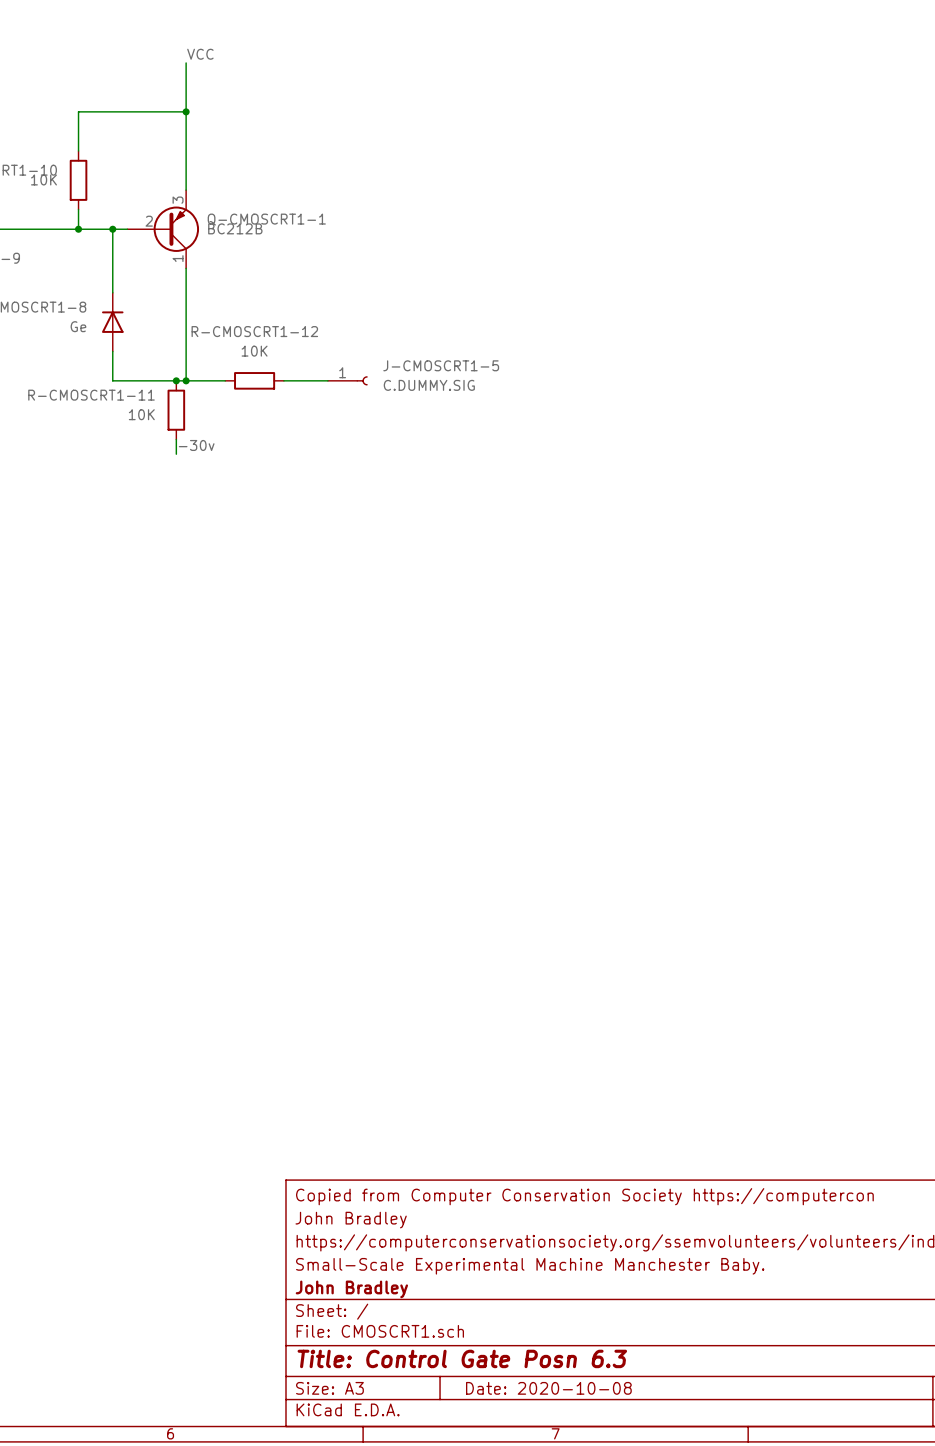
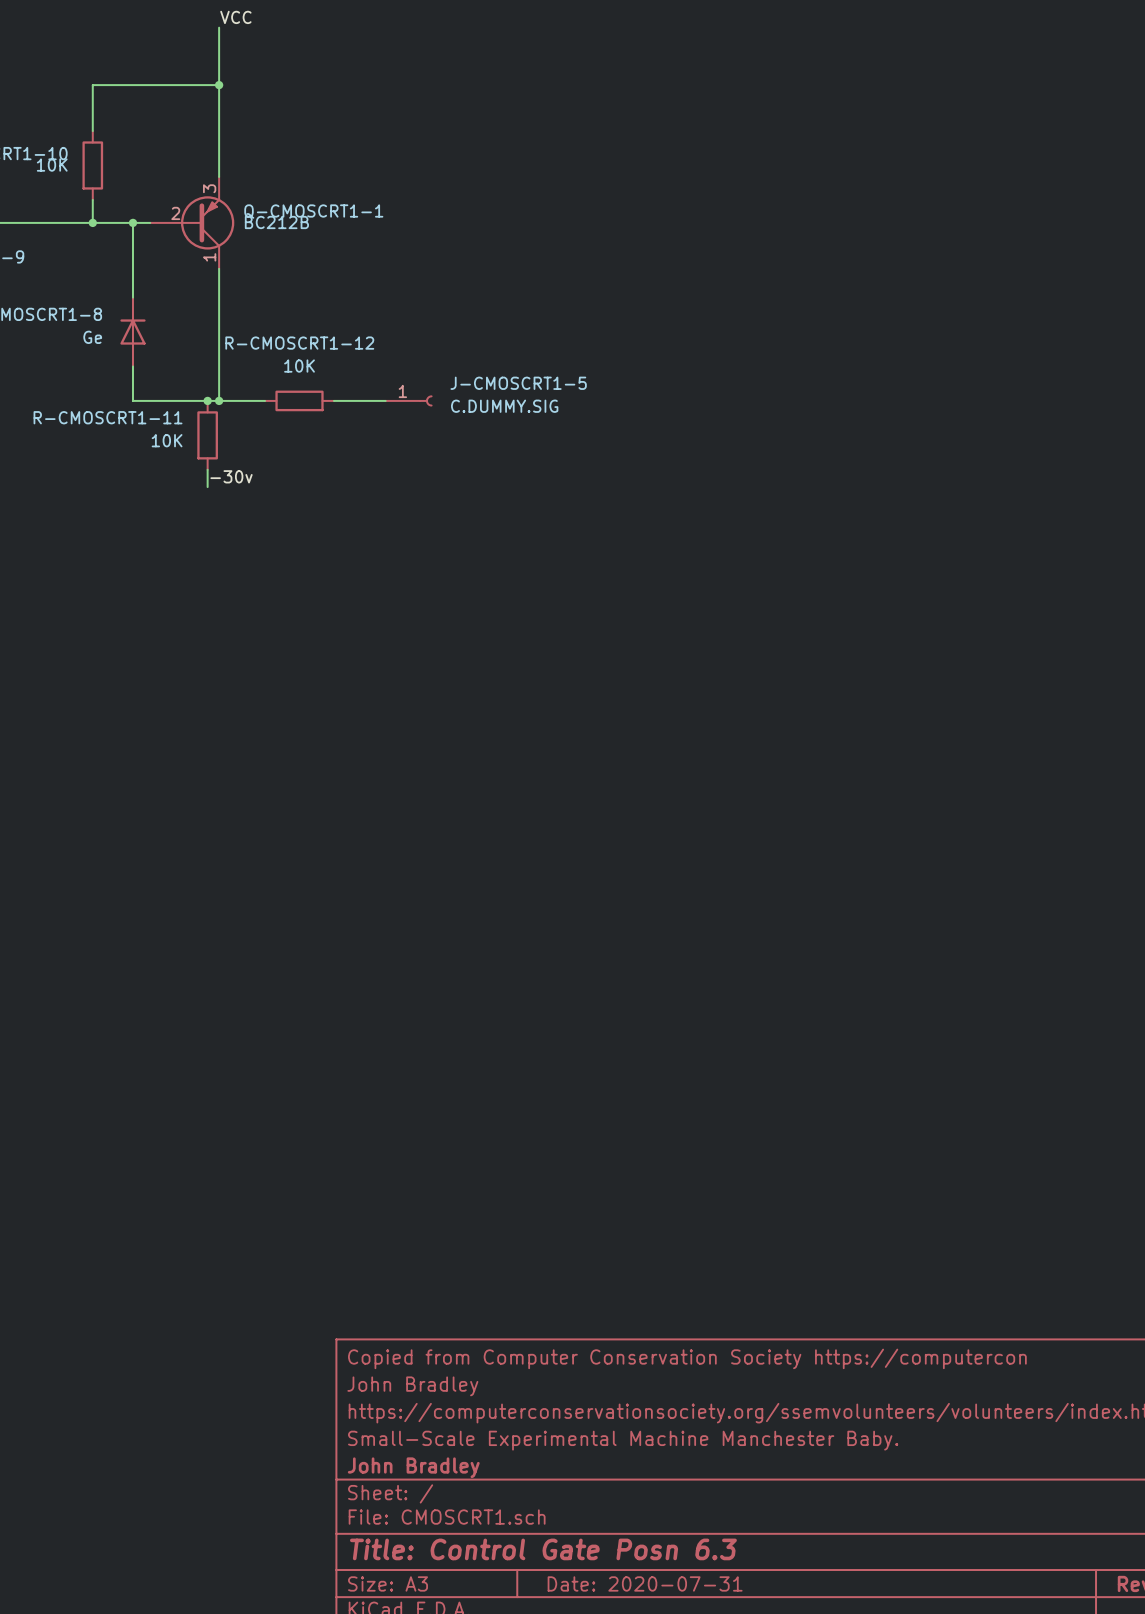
title block: Date: 2020-10-08 (548, 1388) -> Date: 2020-07-31 (645, 1583)

